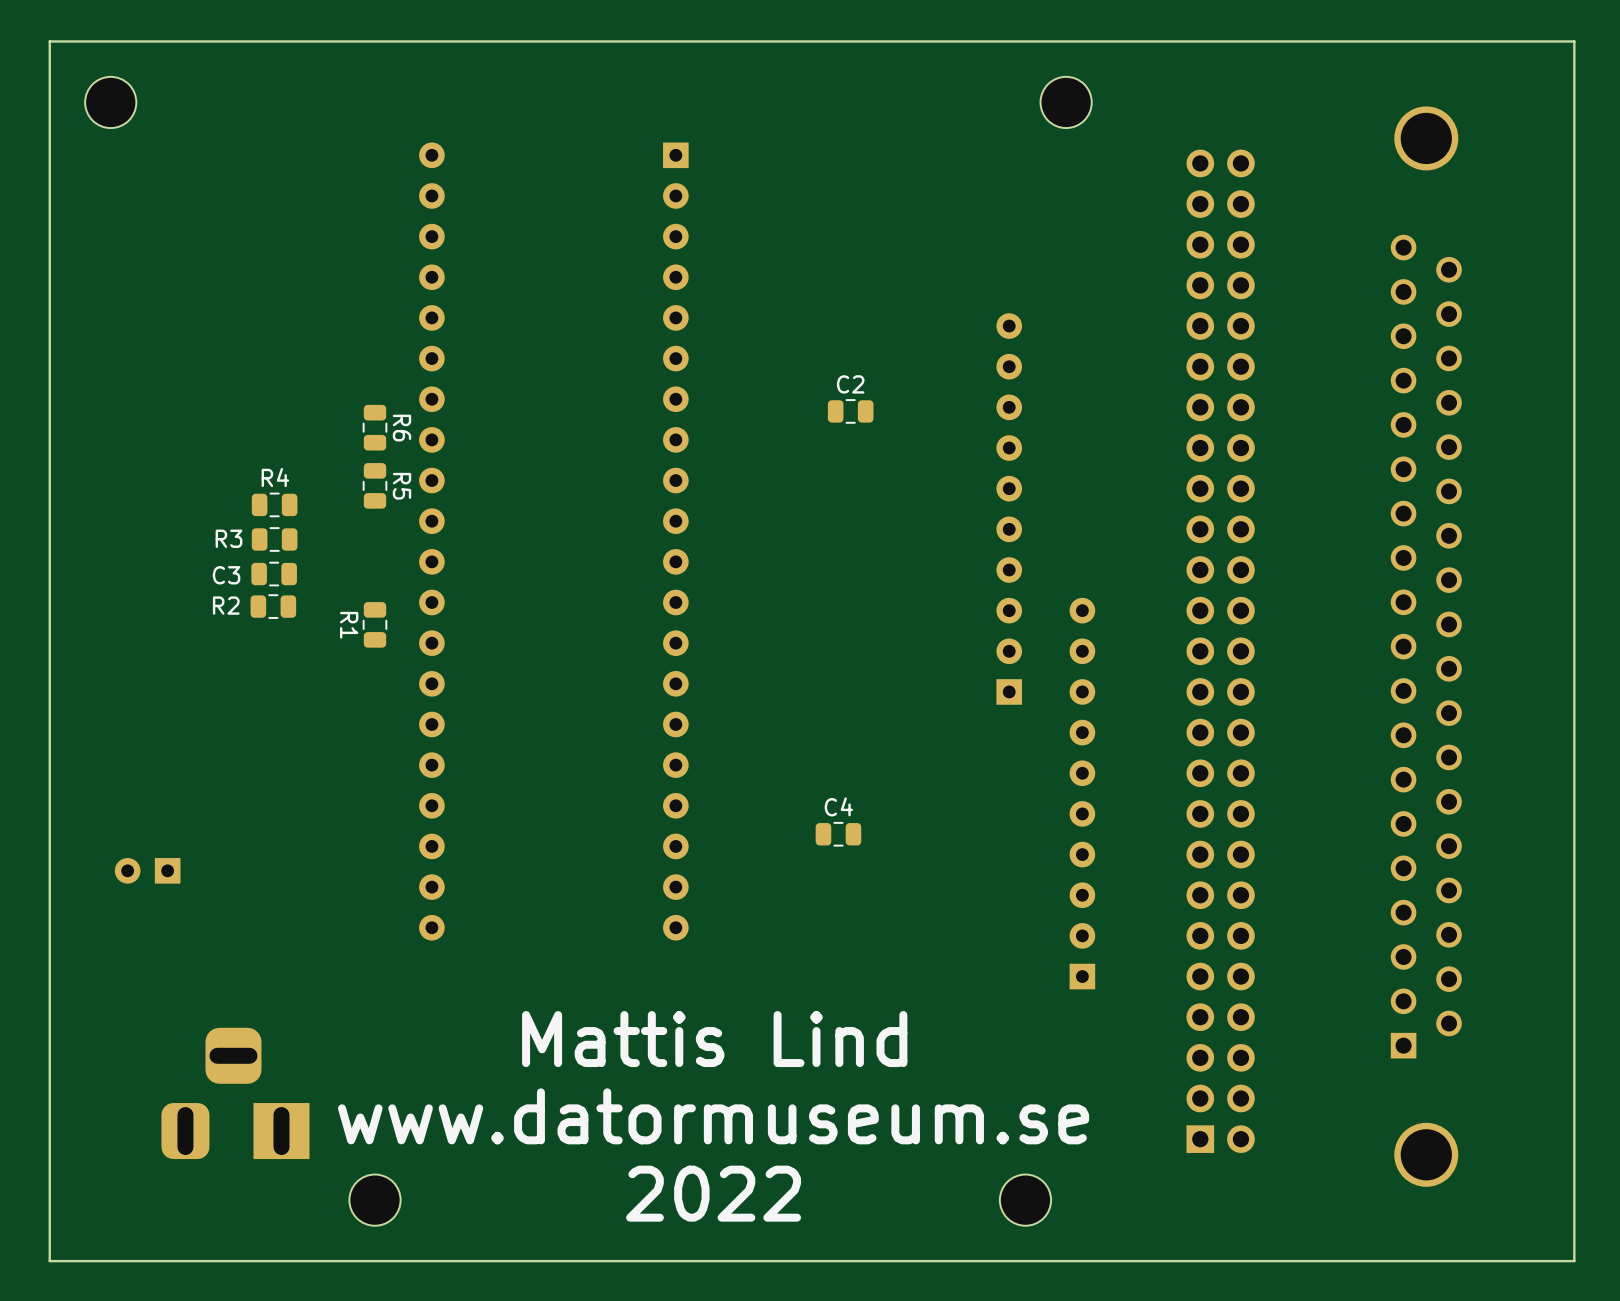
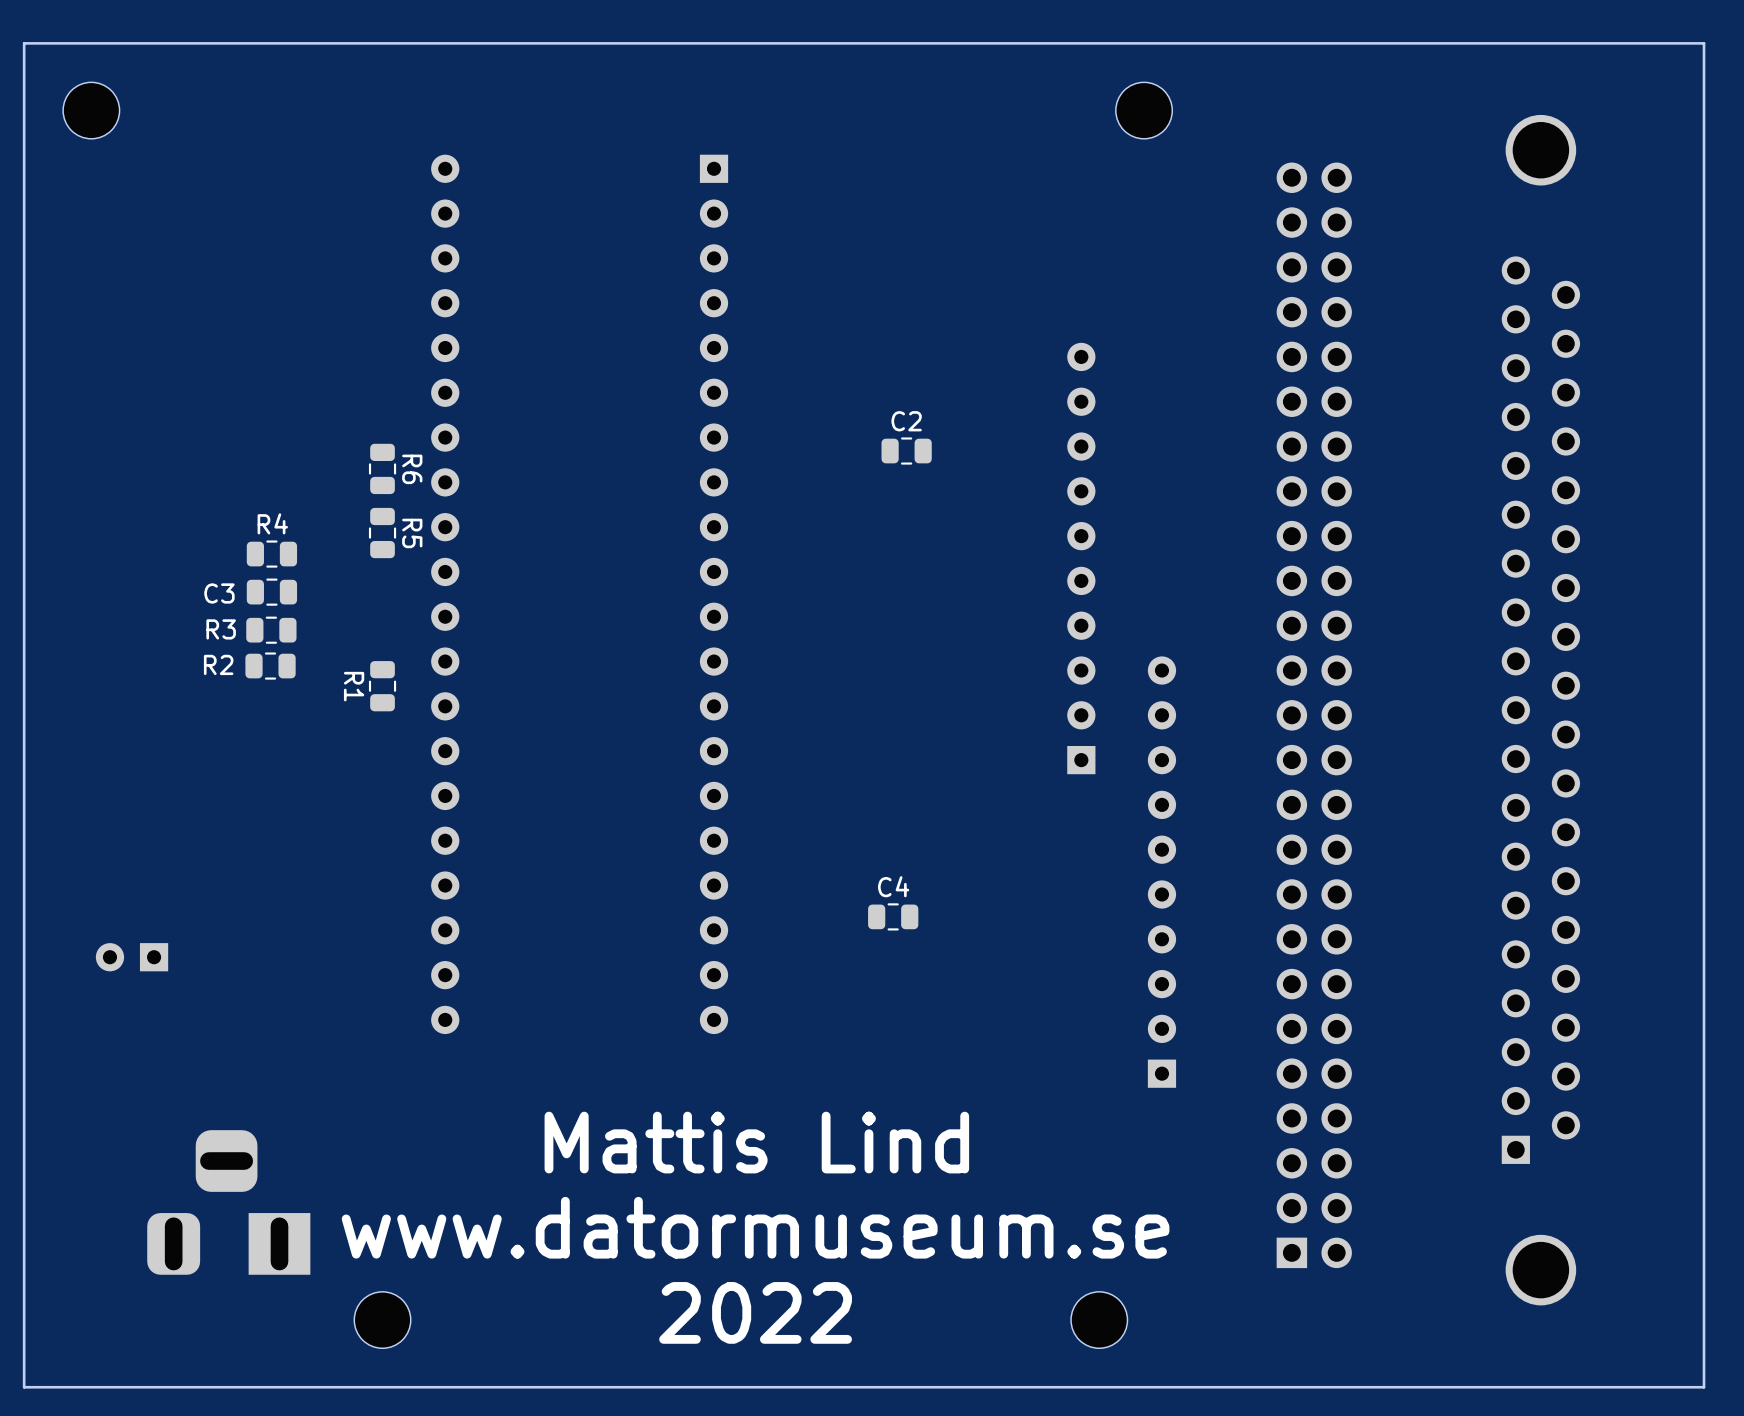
R3 name: R3 (229, 538) -> C3 (219, 593)
C3 name: C3 (226, 575) -> R3 (221, 629)

